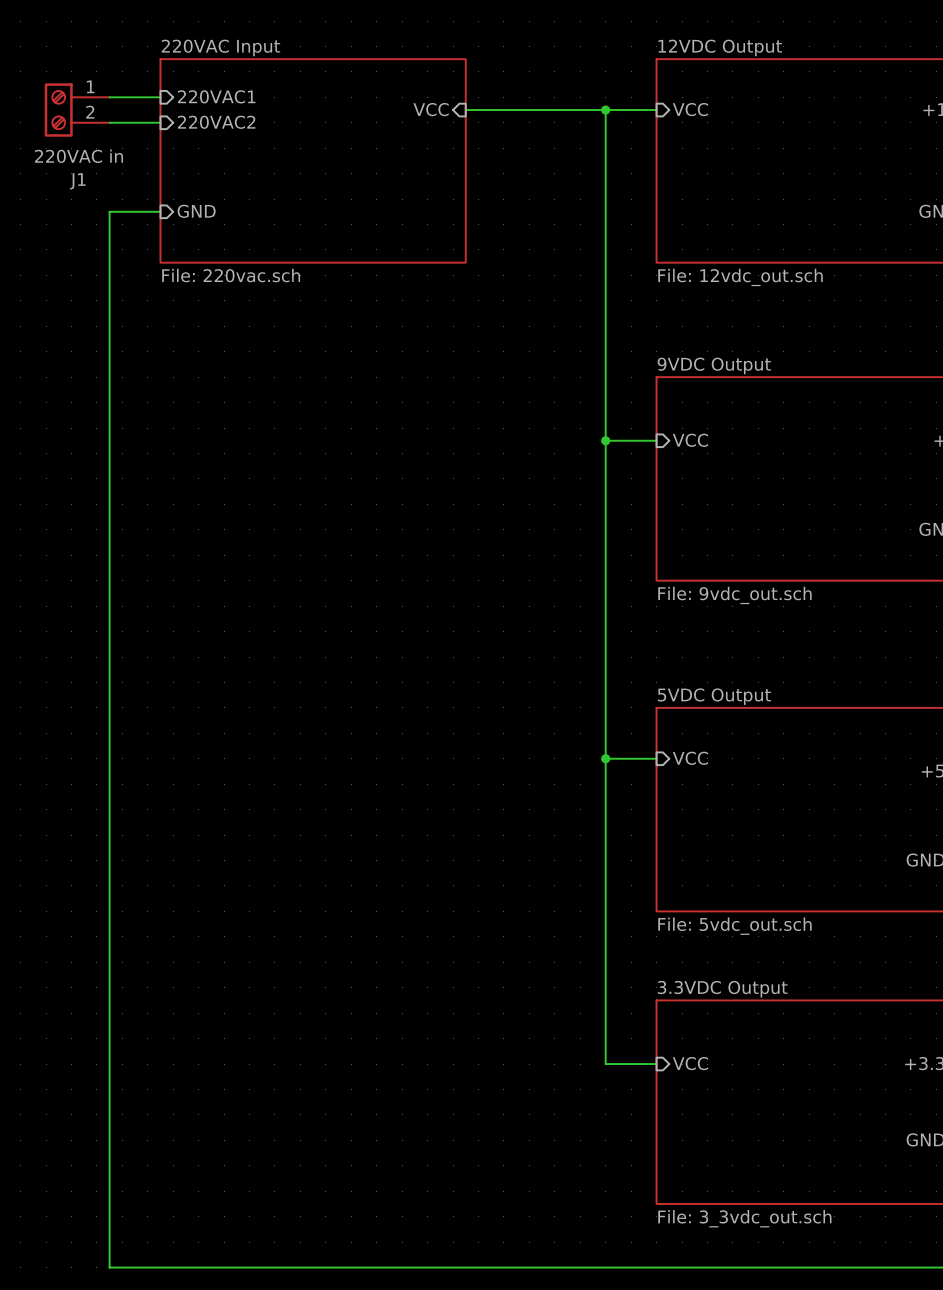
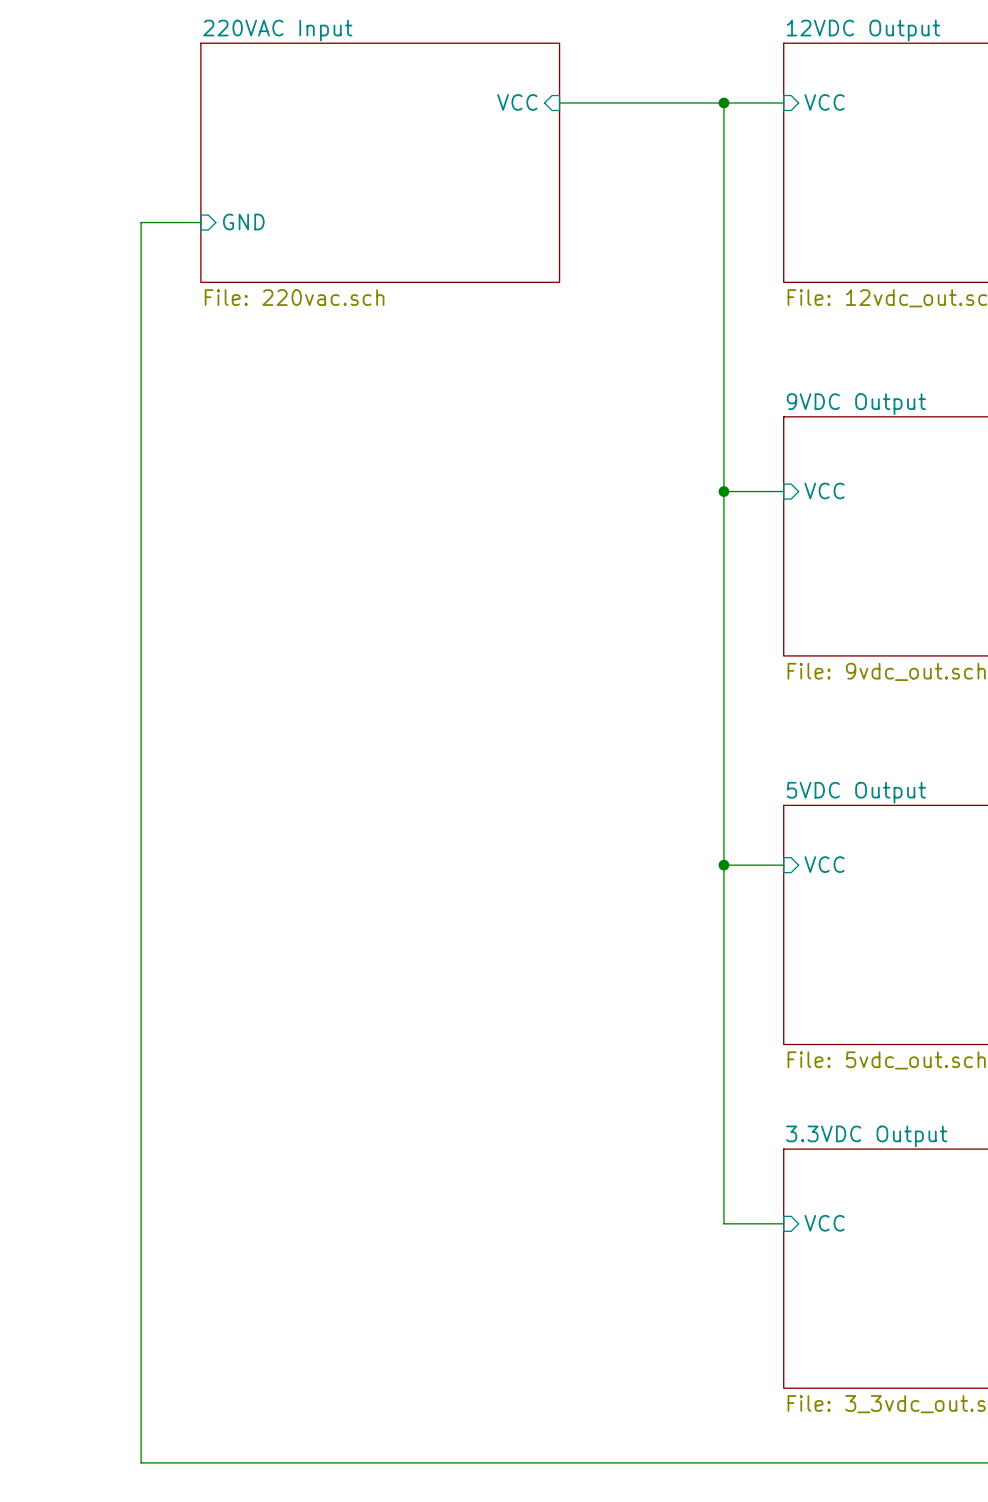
sheet pin: 220VAC1 (216, 96) -> none
wire: (109, 97) (160, 97) -> none
J1: 220VAC in (77, 110) -> none
wire: (109, 122) (160, 122) -> none
sheet pin: 220VAC2 (216, 122) -> none

